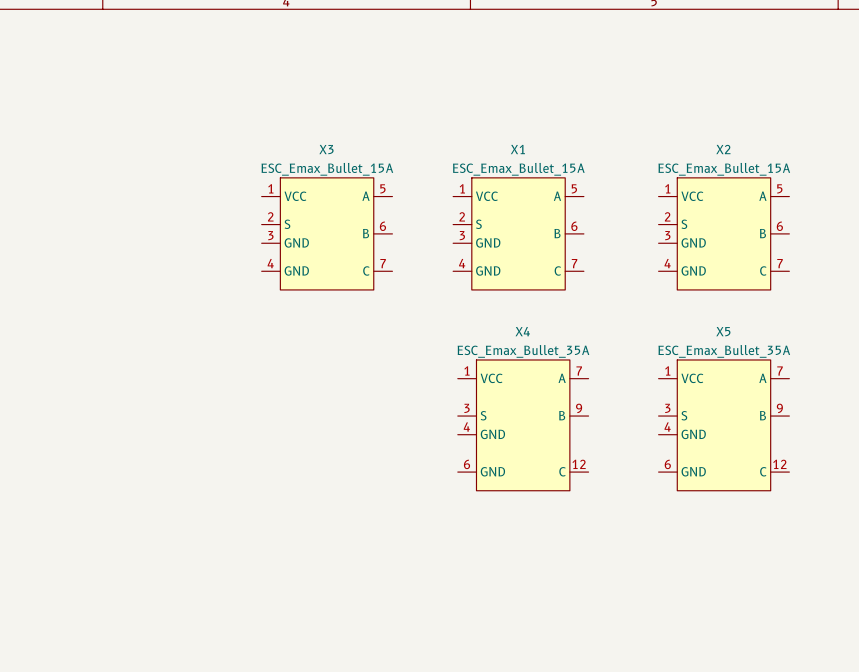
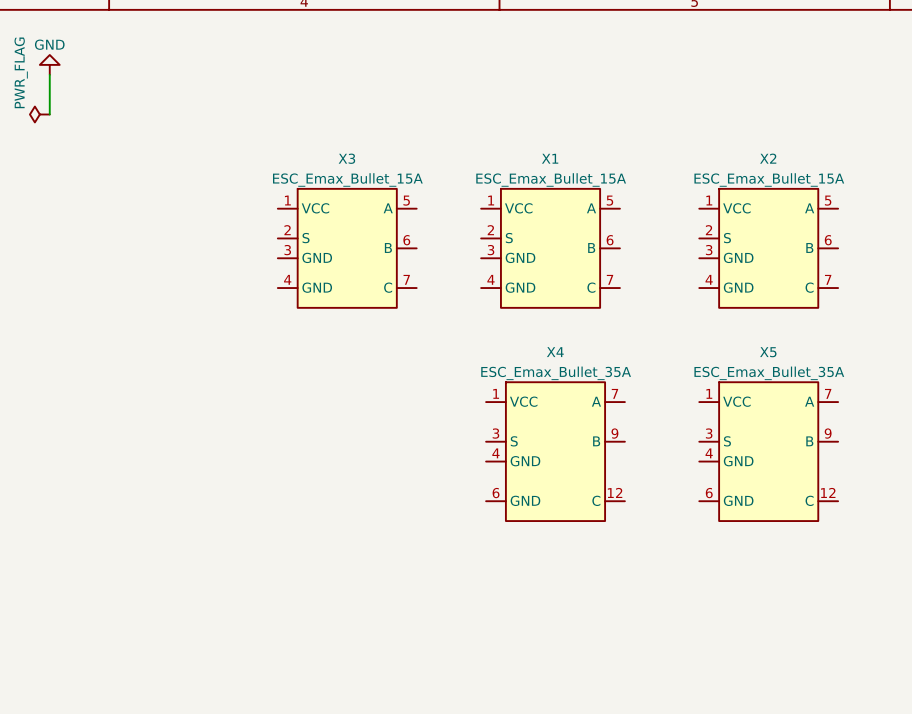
power symbol: none -> GND (49, 64)
wire: none -> (49, 74) (49, 114)
power symbol: none -> PWR_FLAG (39, 114)

